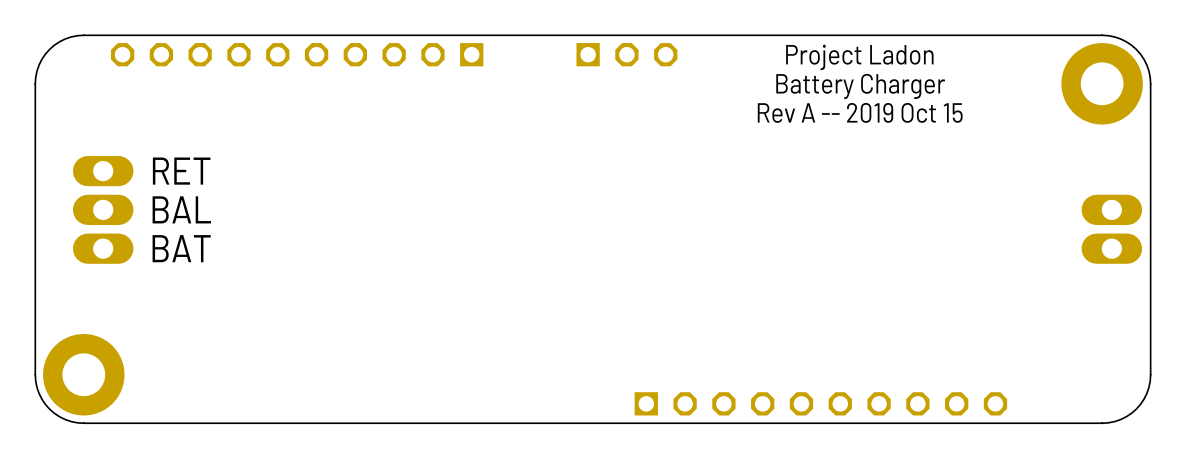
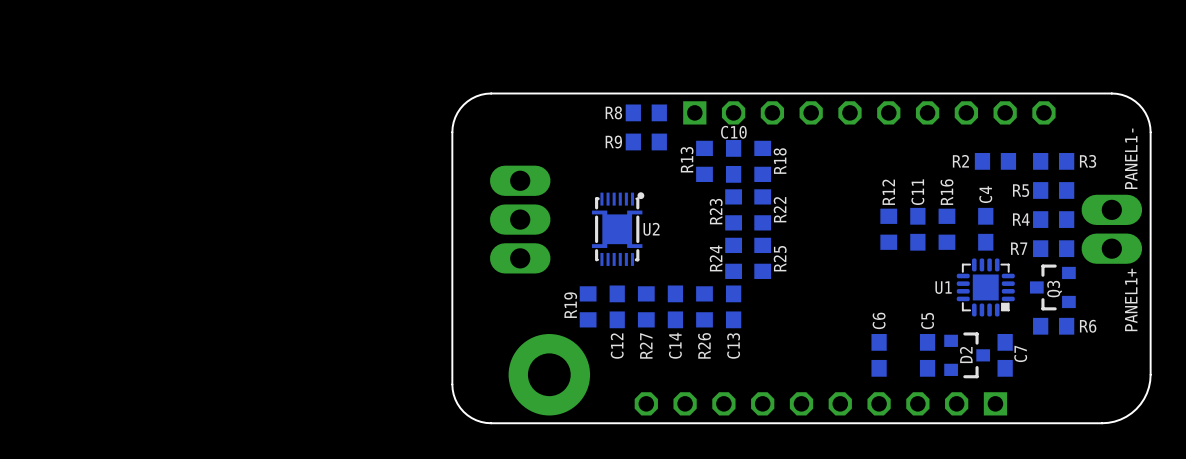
part: (297, 54) -> none
part: (626, 54) -> none
text: Project Ladon (859, 57) -> none
part: (1102, 83) -> none
text: Battery Charger (860, 86) -> none
R8: none -> (646, 112)
text: Rev A -- 2019 Oct 15 (860, 112) -> none
part: none -> (869, 112)
board edge: (1150, 132) (1150, 83) (1146, 65) (1140, 54) (1131, 45) (1120, 38) (1108, 35) (83, 35) (65, 38) (54, 45) (45, 54) (36, 71) (35, 83) (35, 374) (38, 393) (45, 404) (54, 413) (71, 421) (83, 423) (491, 423) -> (1150, 132) (1147, 117) (1139, 104) (1126, 96) (1111, 93) (491, 93) (476, 96) (460, 108) (452, 127) (452, 384) (455, 399) (463, 411) (476, 420) (491, 423)
R9: none -> (646, 141)
text: none -> PANEL1- (1131, 158)
R13: none -> (704, 161)
C10: none -> (733, 161)
R18: none -> (762, 161)
R2: none -> (995, 161)
R3: none -> (1053, 161)
RET: (103, 171) -> none
part: none -> (520, 180)
R5: none -> (1053, 190)
BAL: (103, 209) -> none
R23: none -> (733, 209)
R22: none -> (762, 209)
part: none -> (520, 219)
R4: none -> (1053, 219)
U2: none -> (618, 229)
R12: none -> (888, 229)
C11: none -> (917, 229)
R16: none -> (946, 229)
C4: none -> (985, 229)
BAT: (103, 248) -> none
R7: none -> (1053, 248)
part: none -> (520, 258)
R24: none -> (733, 258)
R25: none -> (762, 258)
U1: none -> (985, 287)
Q3: none -> (1052, 287)
text: none -> PANEL1+ (1131, 299)
R19: none -> (588, 306)
C12: none -> (617, 306)
R27: none -> (646, 306)
C14: none -> (675, 306)
R26: none -> (704, 306)
C13: none -> (733, 306)
R6: none -> (1053, 326)
C6: none -> (879, 355)
C5: none -> (927, 355)
D2: none -> (967, 355)
C7: none -> (1005, 355)
part: (83, 374) -> none
part: none -> (549, 374)
part rotation: 0° (820, 403) -> 180° (820, 403)

